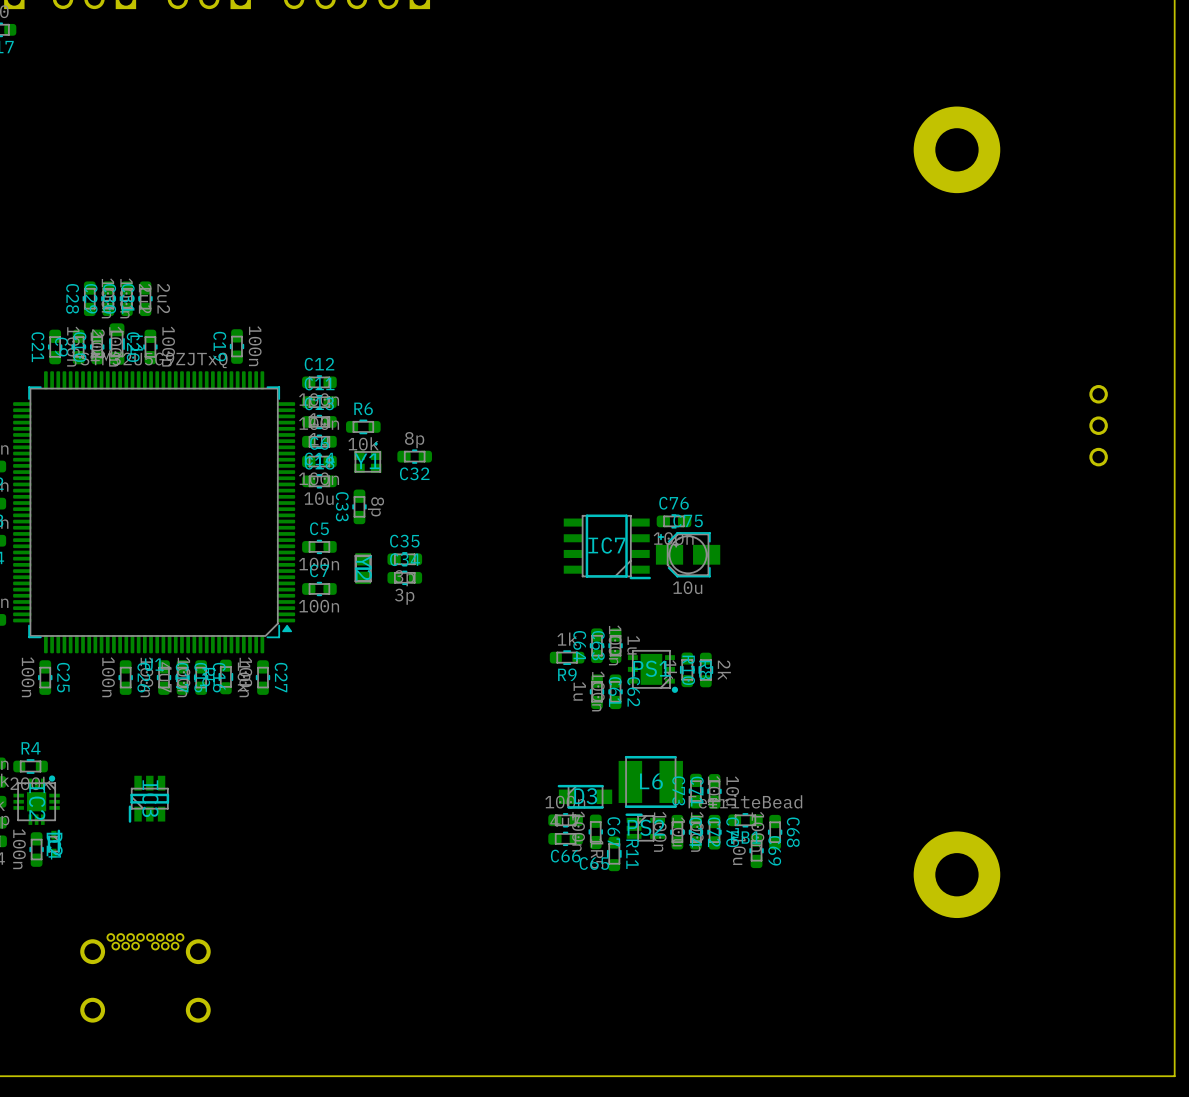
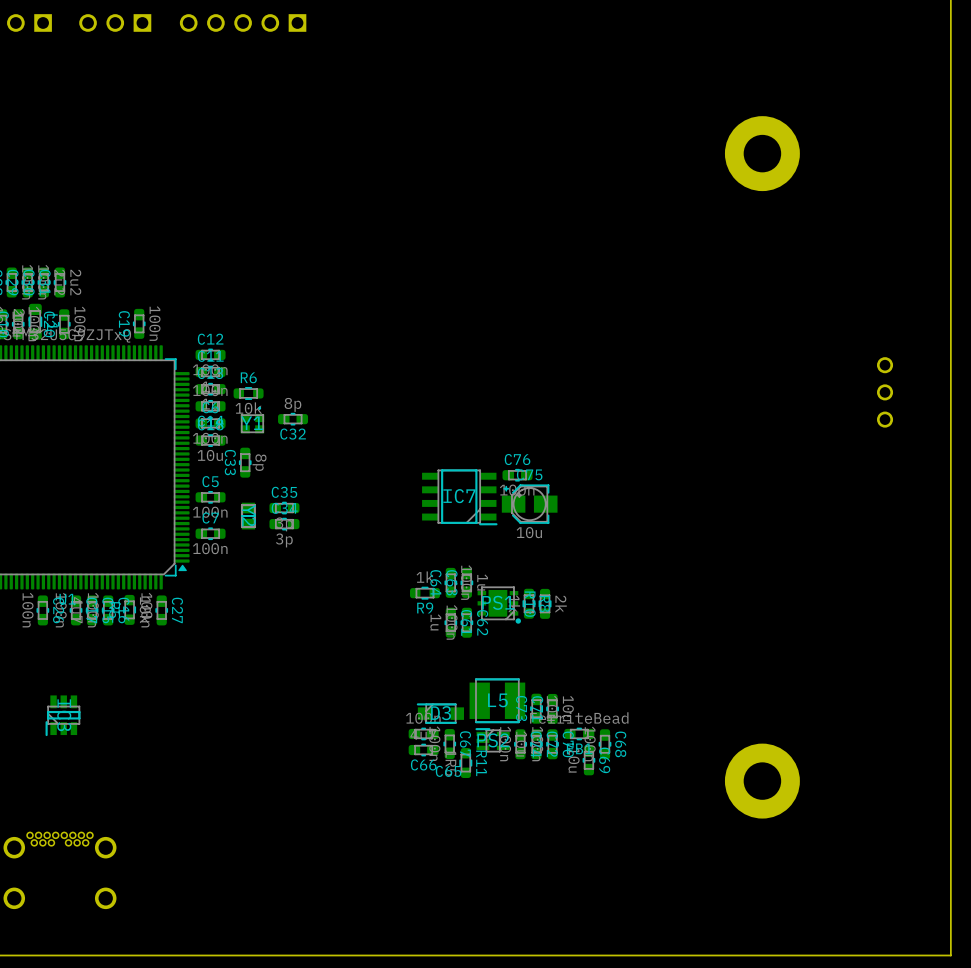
L6 name: L6 (651, 781) -> L5 (497, 700)

